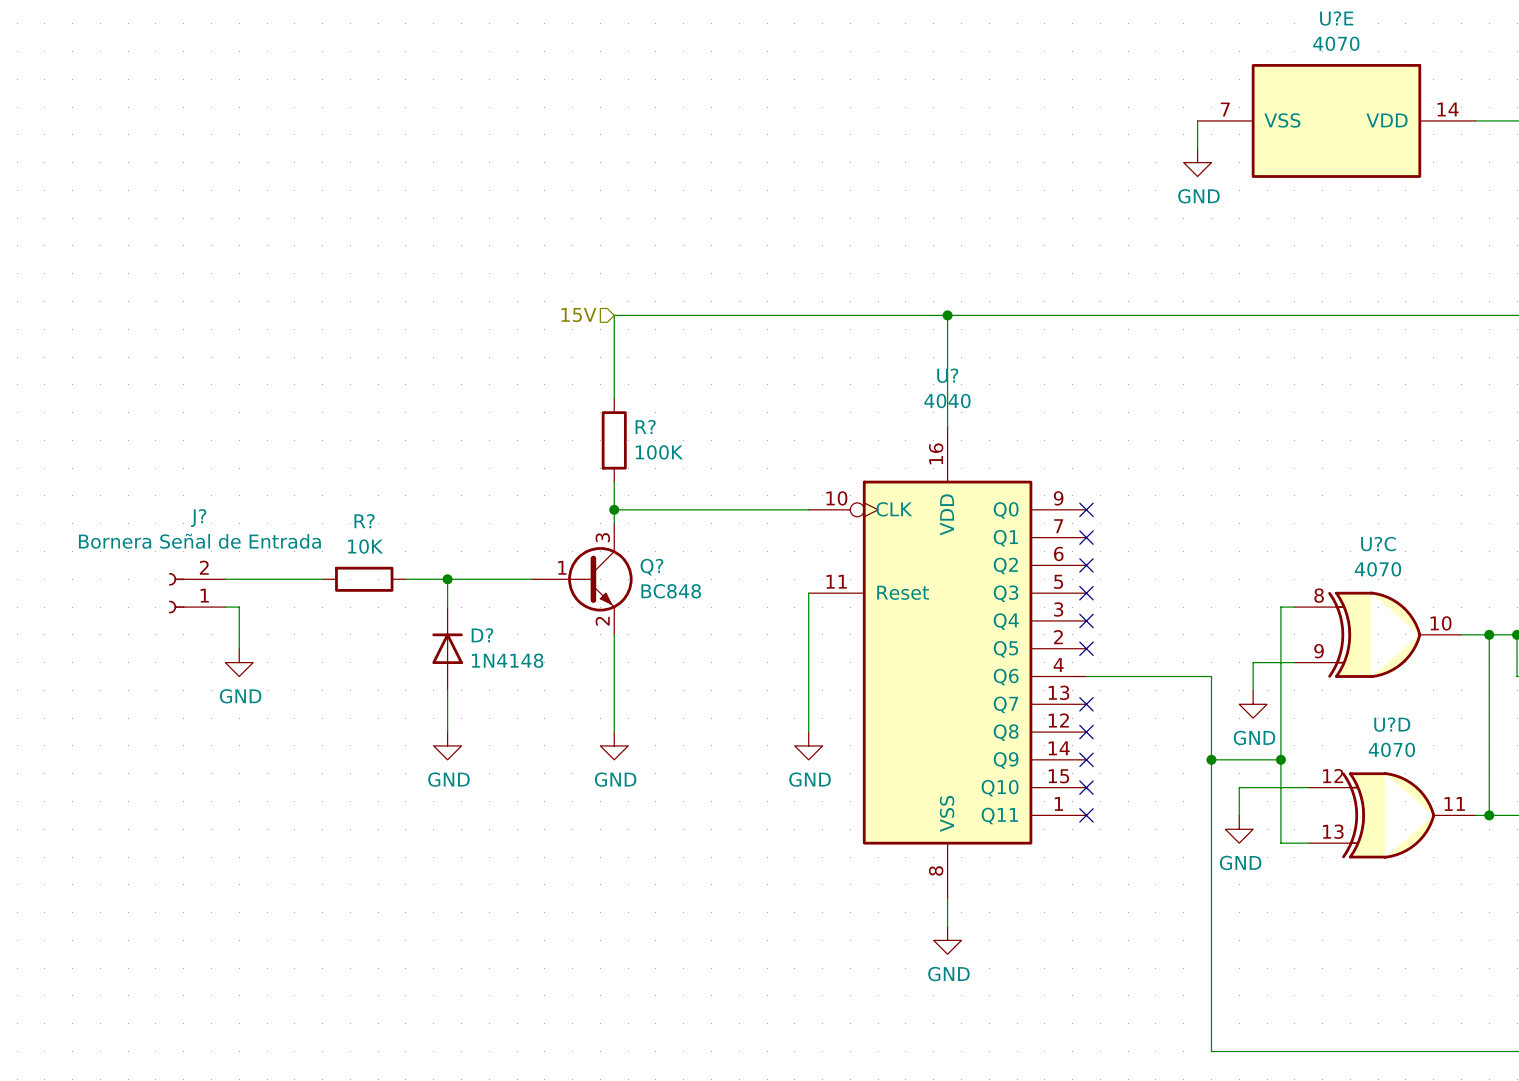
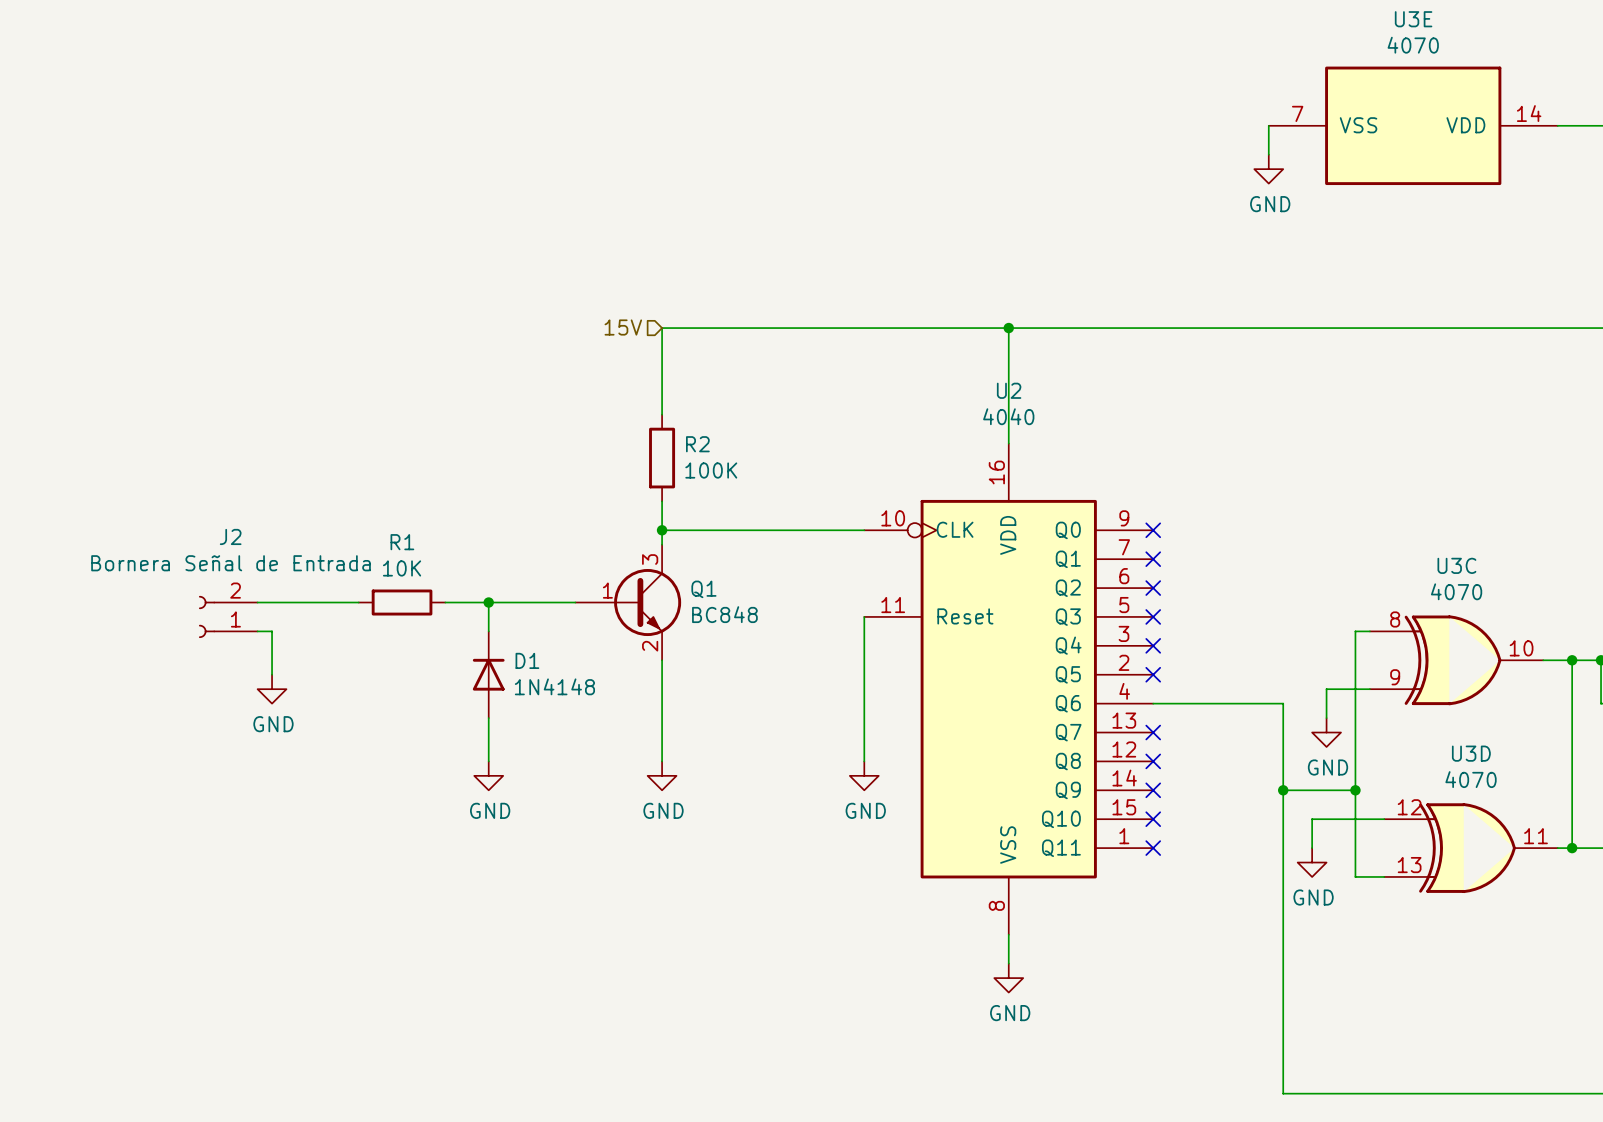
U?E name: U?E (1336, 18) -> U3E (1413, 19)
U? name: U? (947, 375) -> U2 (1009, 390)
R? name: R? (645, 426) -> R2 (697, 444)
J? name: J? (198, 518) -> J2 (230, 536)
R? name: R? (364, 521) -> R1 (402, 542)
U?C name: U?C (1378, 544) -> U3C (1456, 565)
Q? name: Q? (651, 567) -> Q1 (703, 589)
D? name: D? (482, 635) -> D1 (527, 660)
U?D name: U?D (1392, 724) -> U3D (1471, 753)

